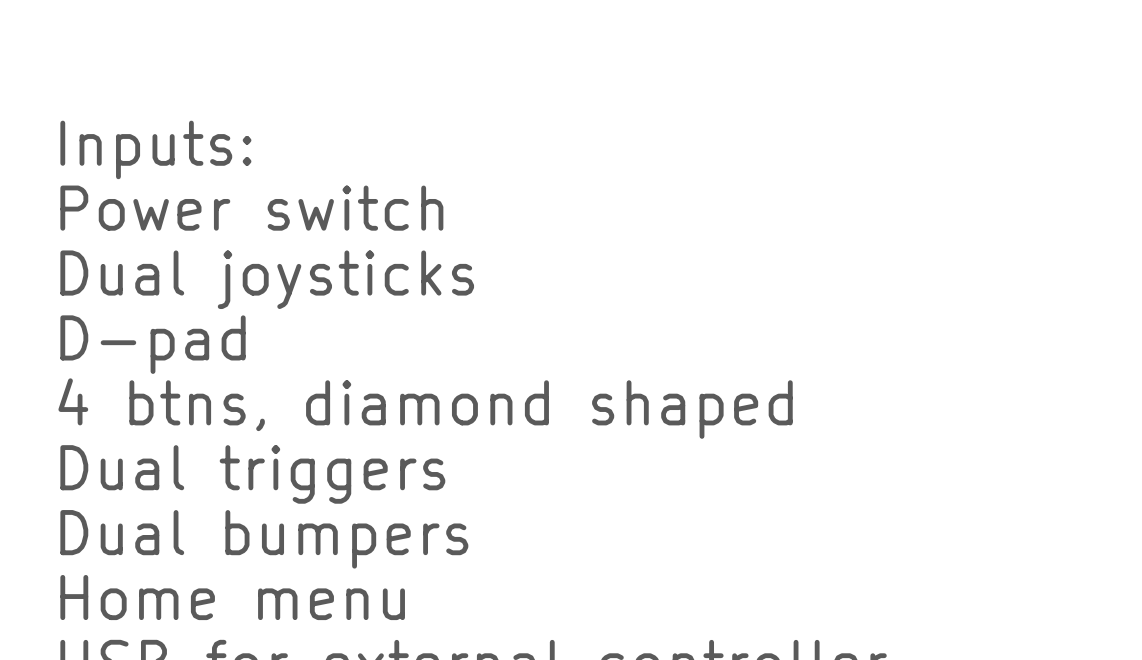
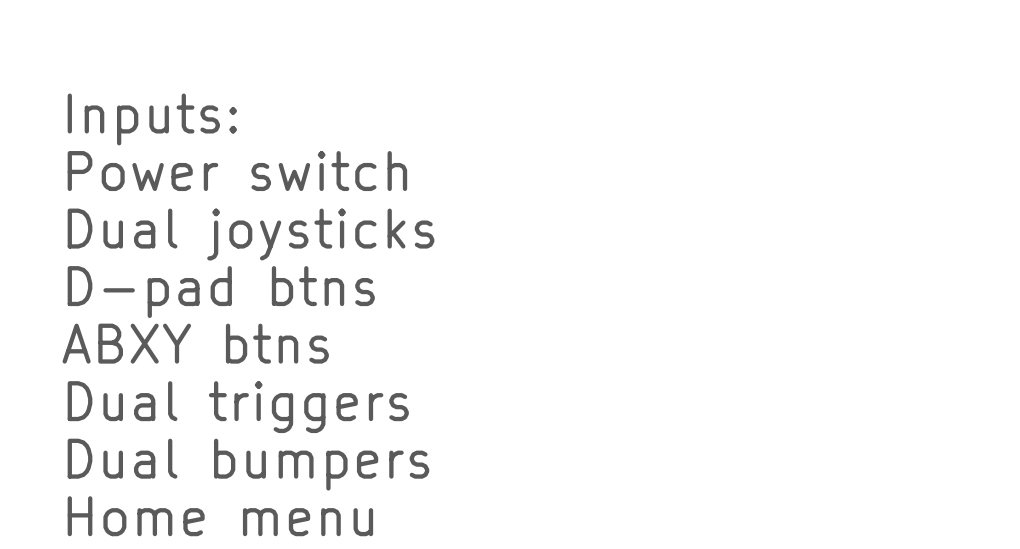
text: D-pad (153, 344) -> D-pad btns (221, 292)
text: 4 btns, diamond shaped (425, 408) -> ABXY btns (195, 343)

